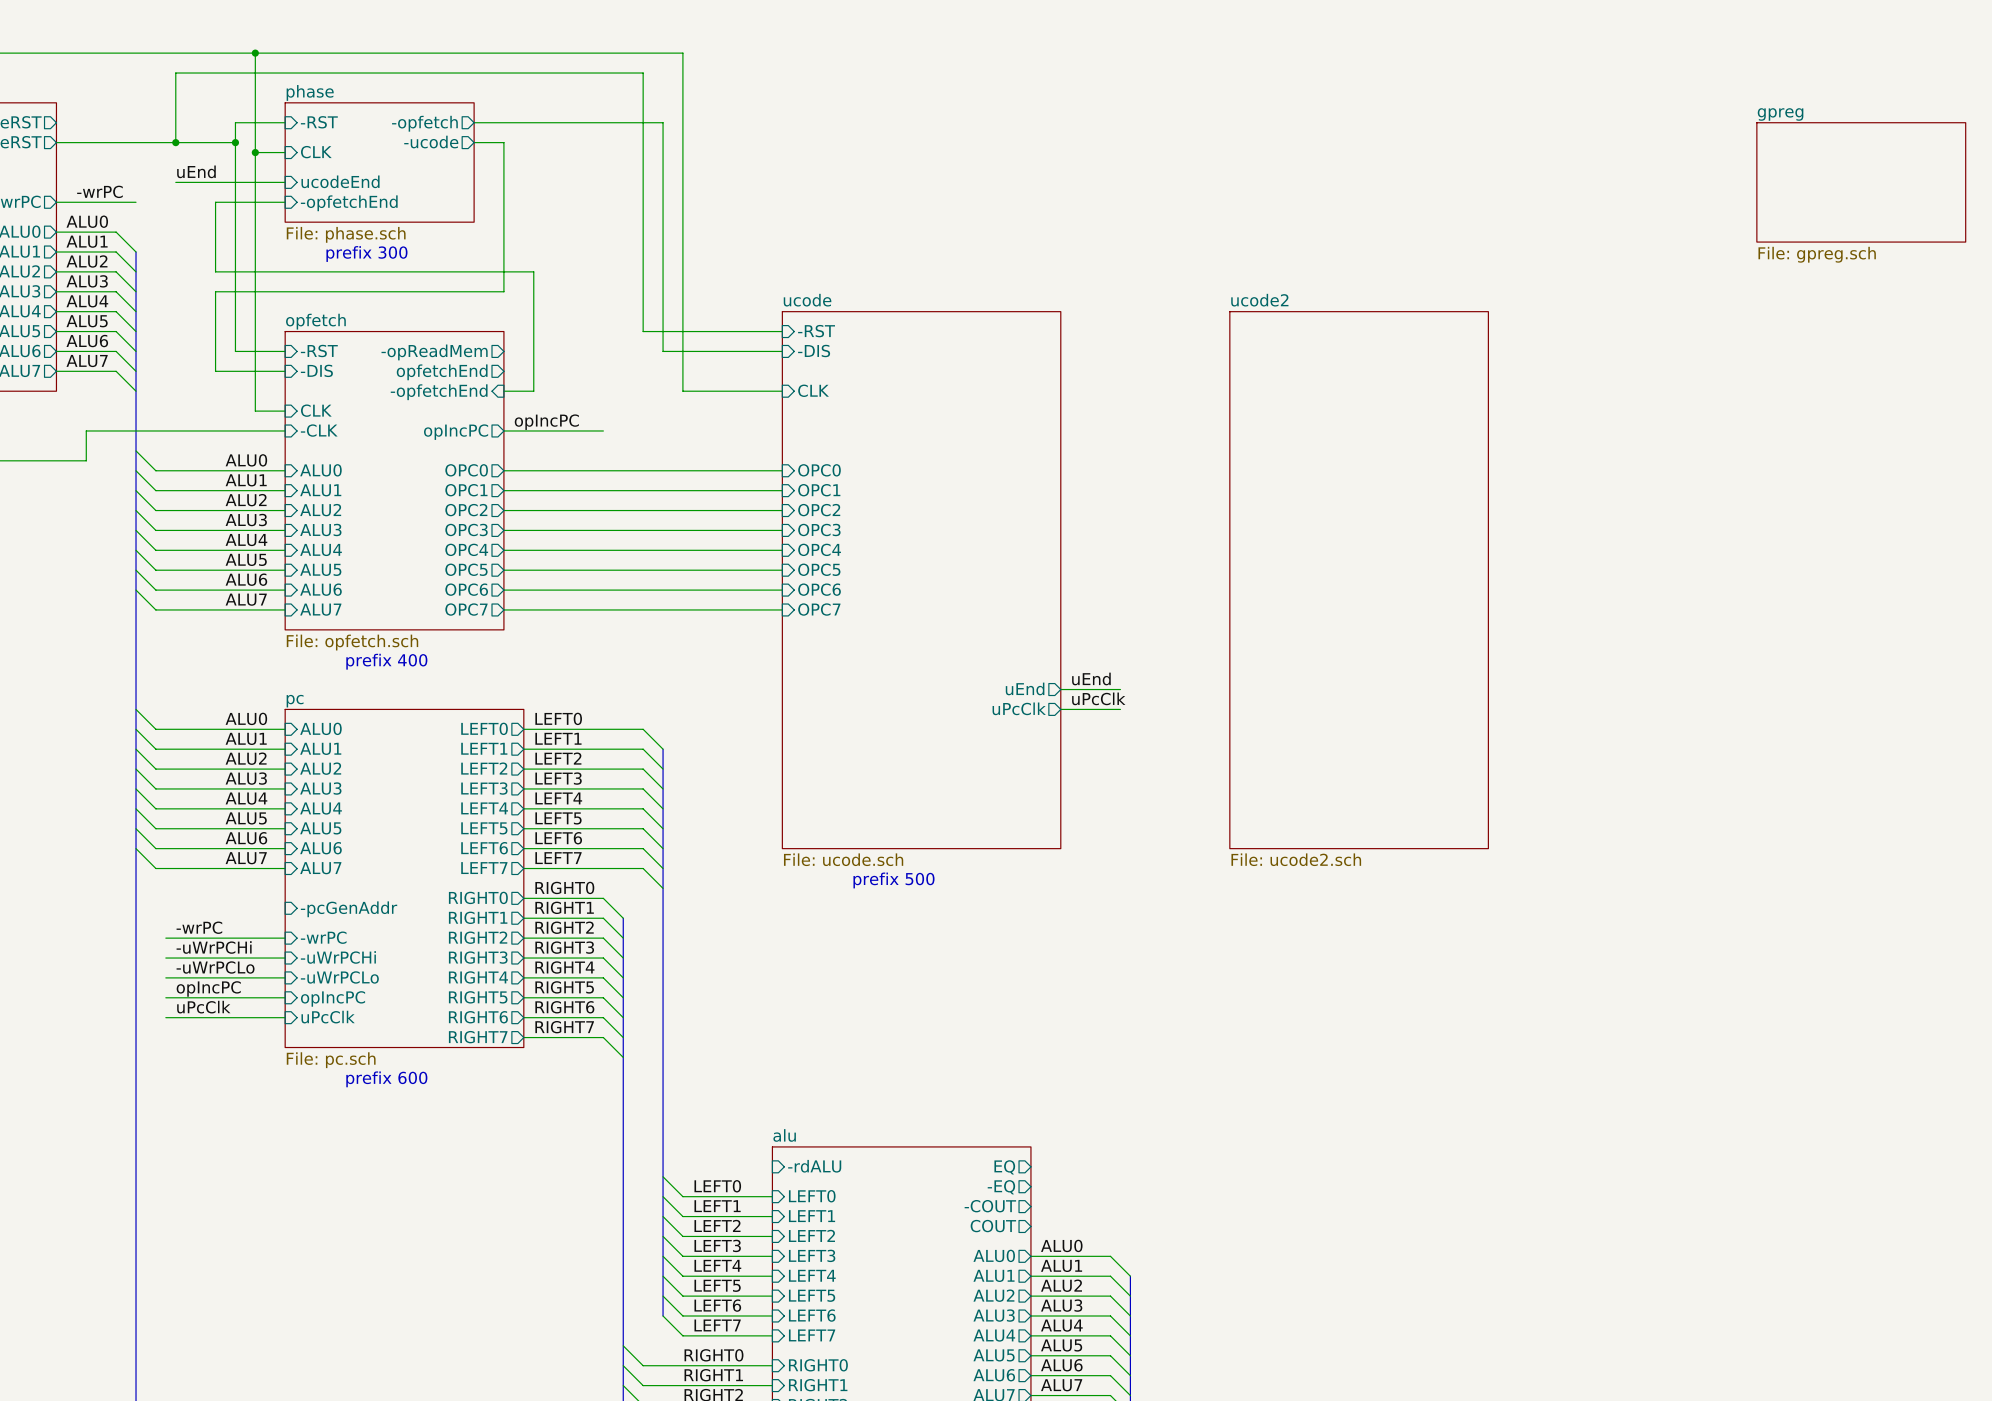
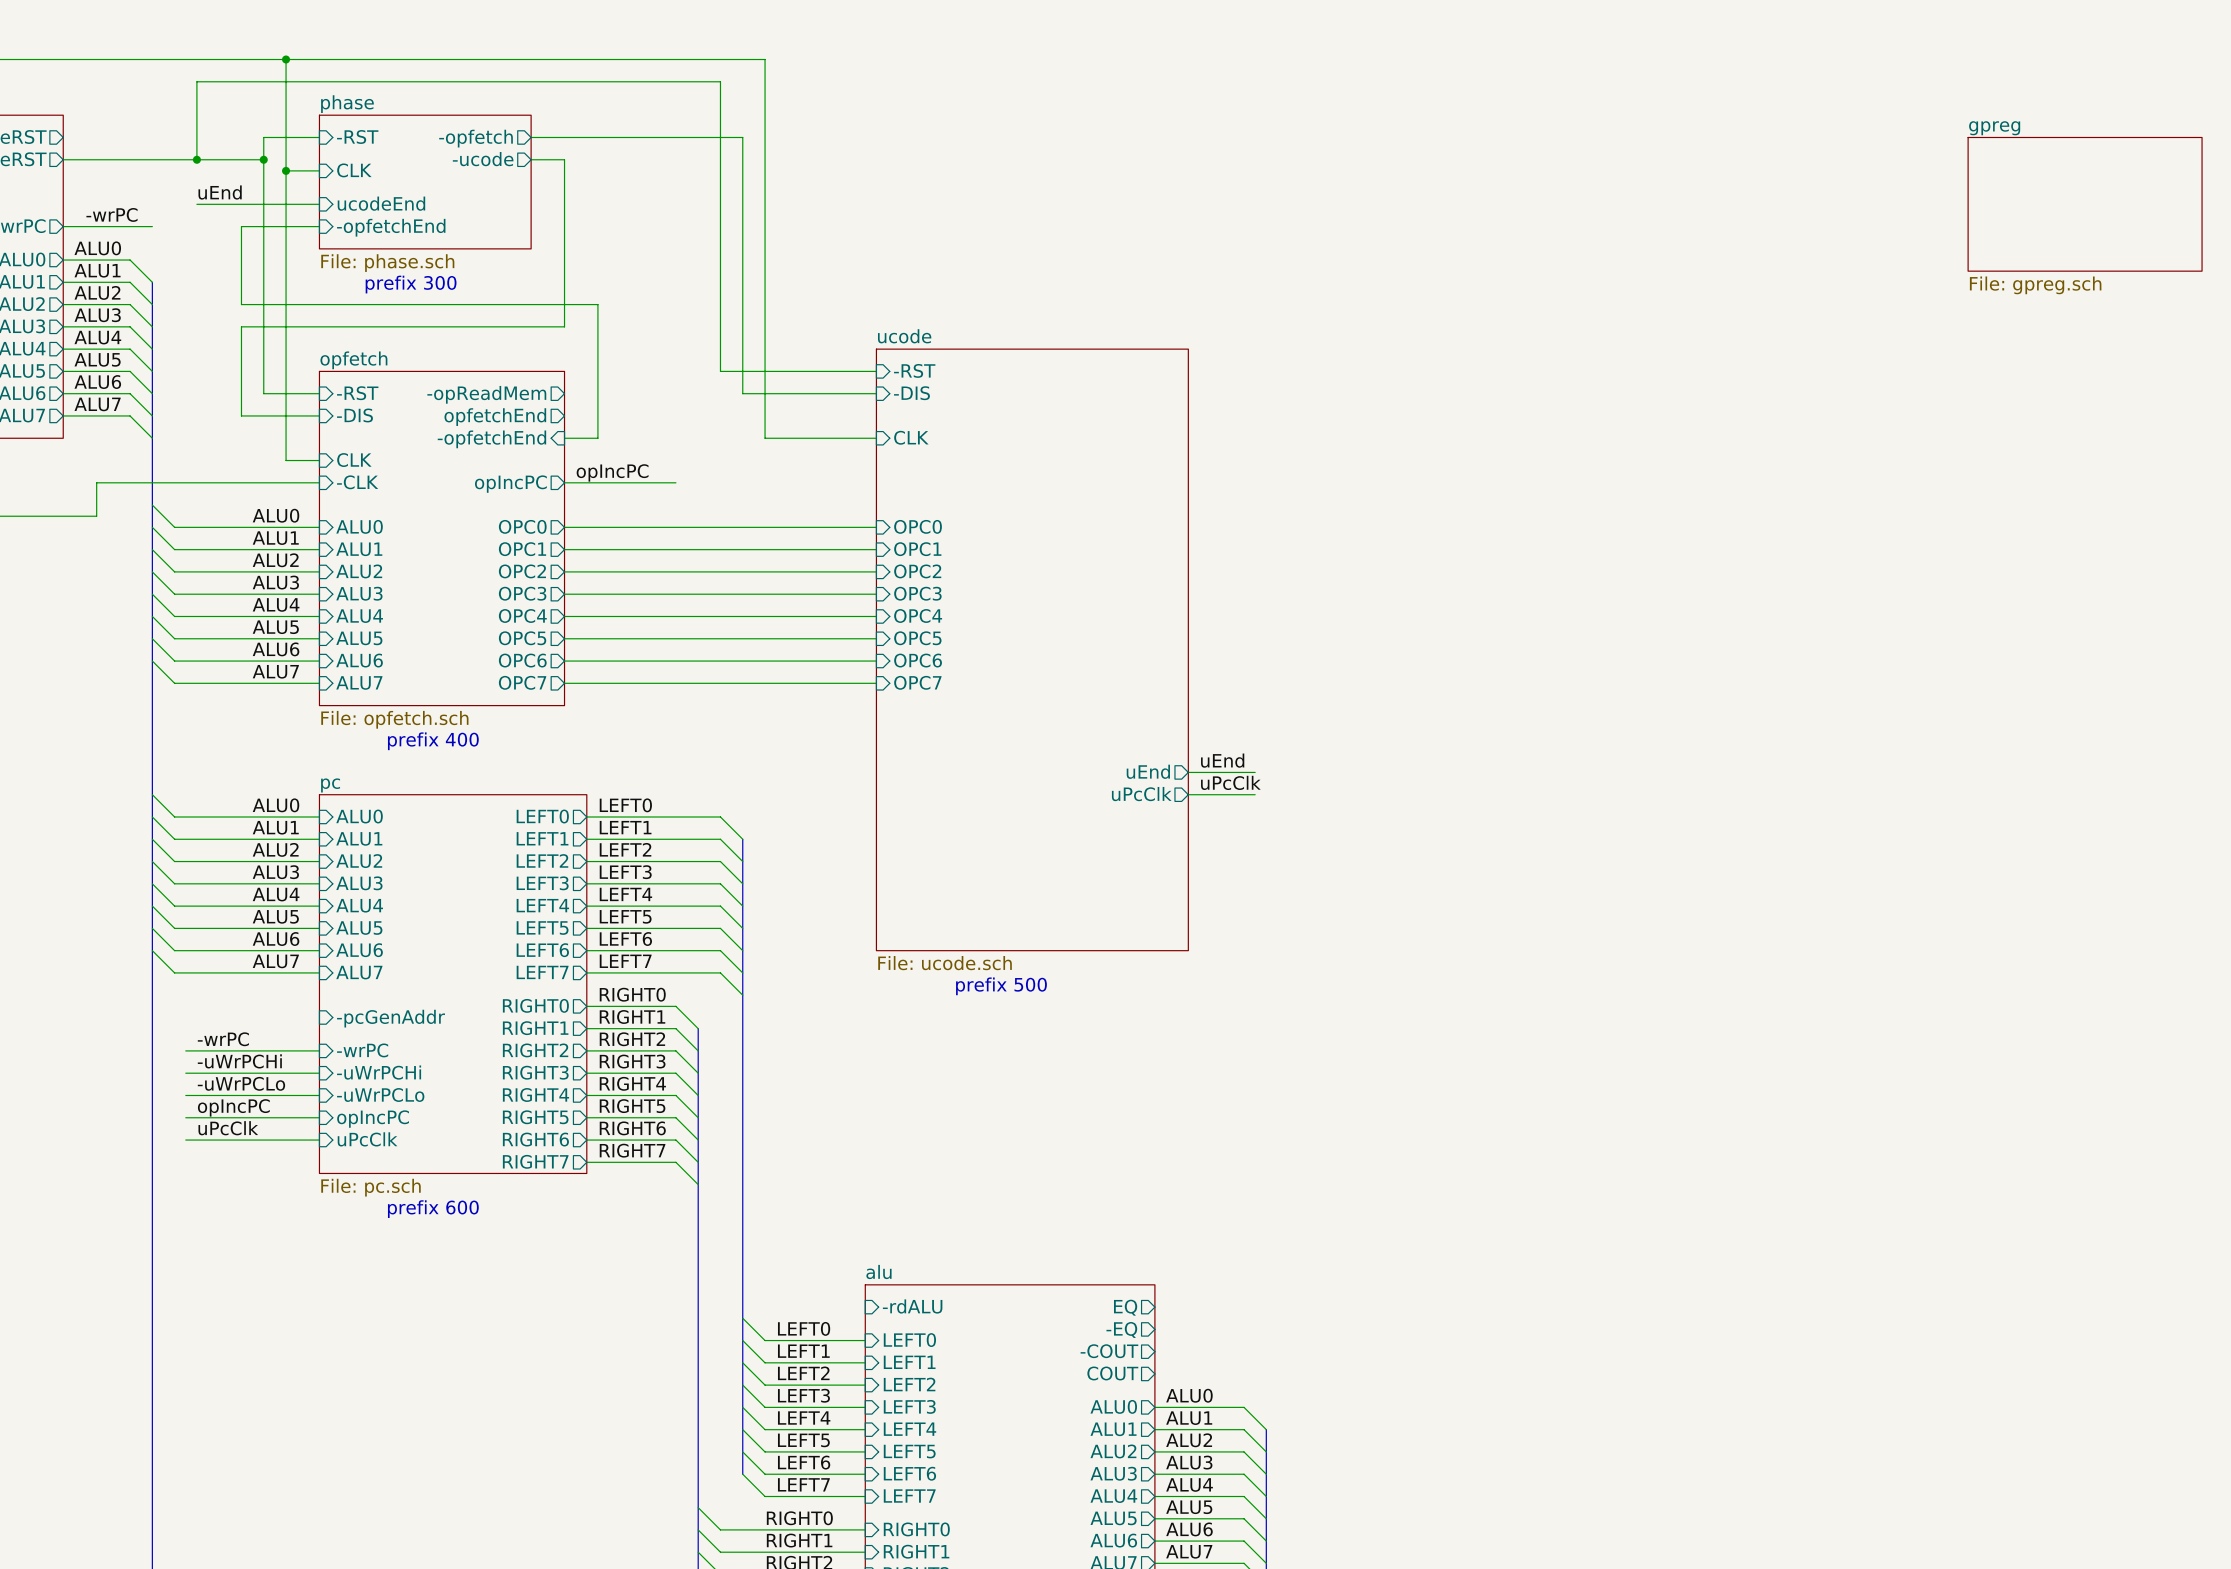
sheet ucode2: File: ucode2.sch (1359, 580) -> none

